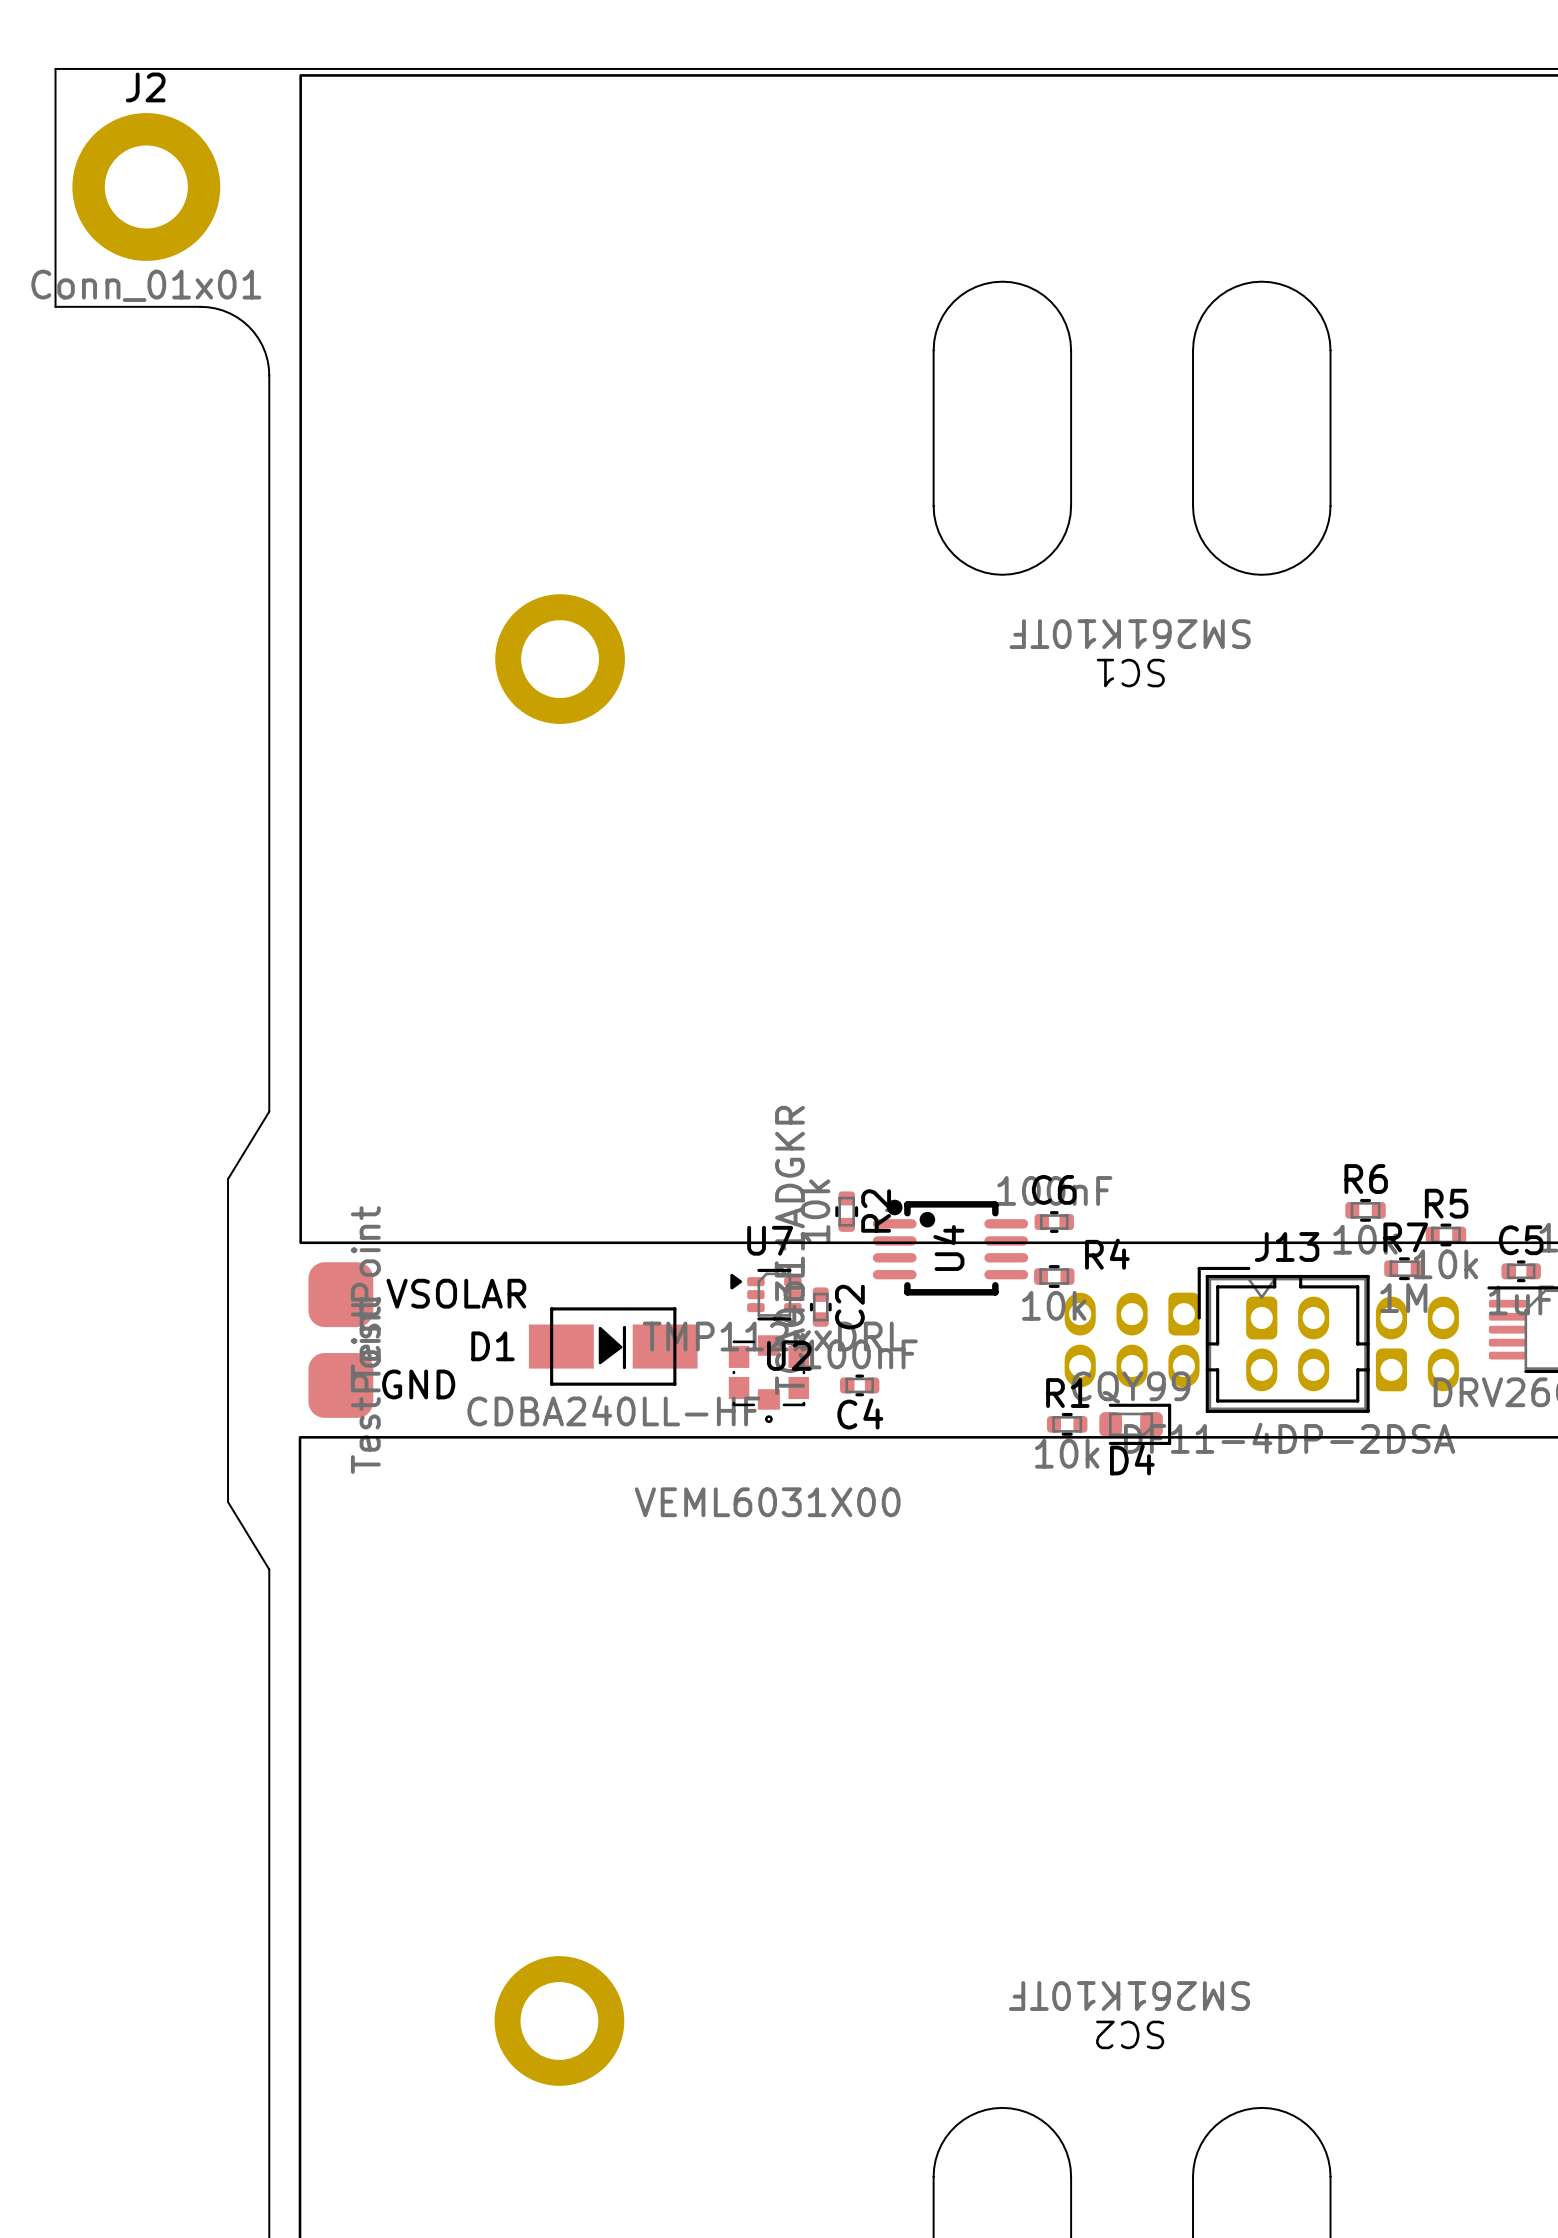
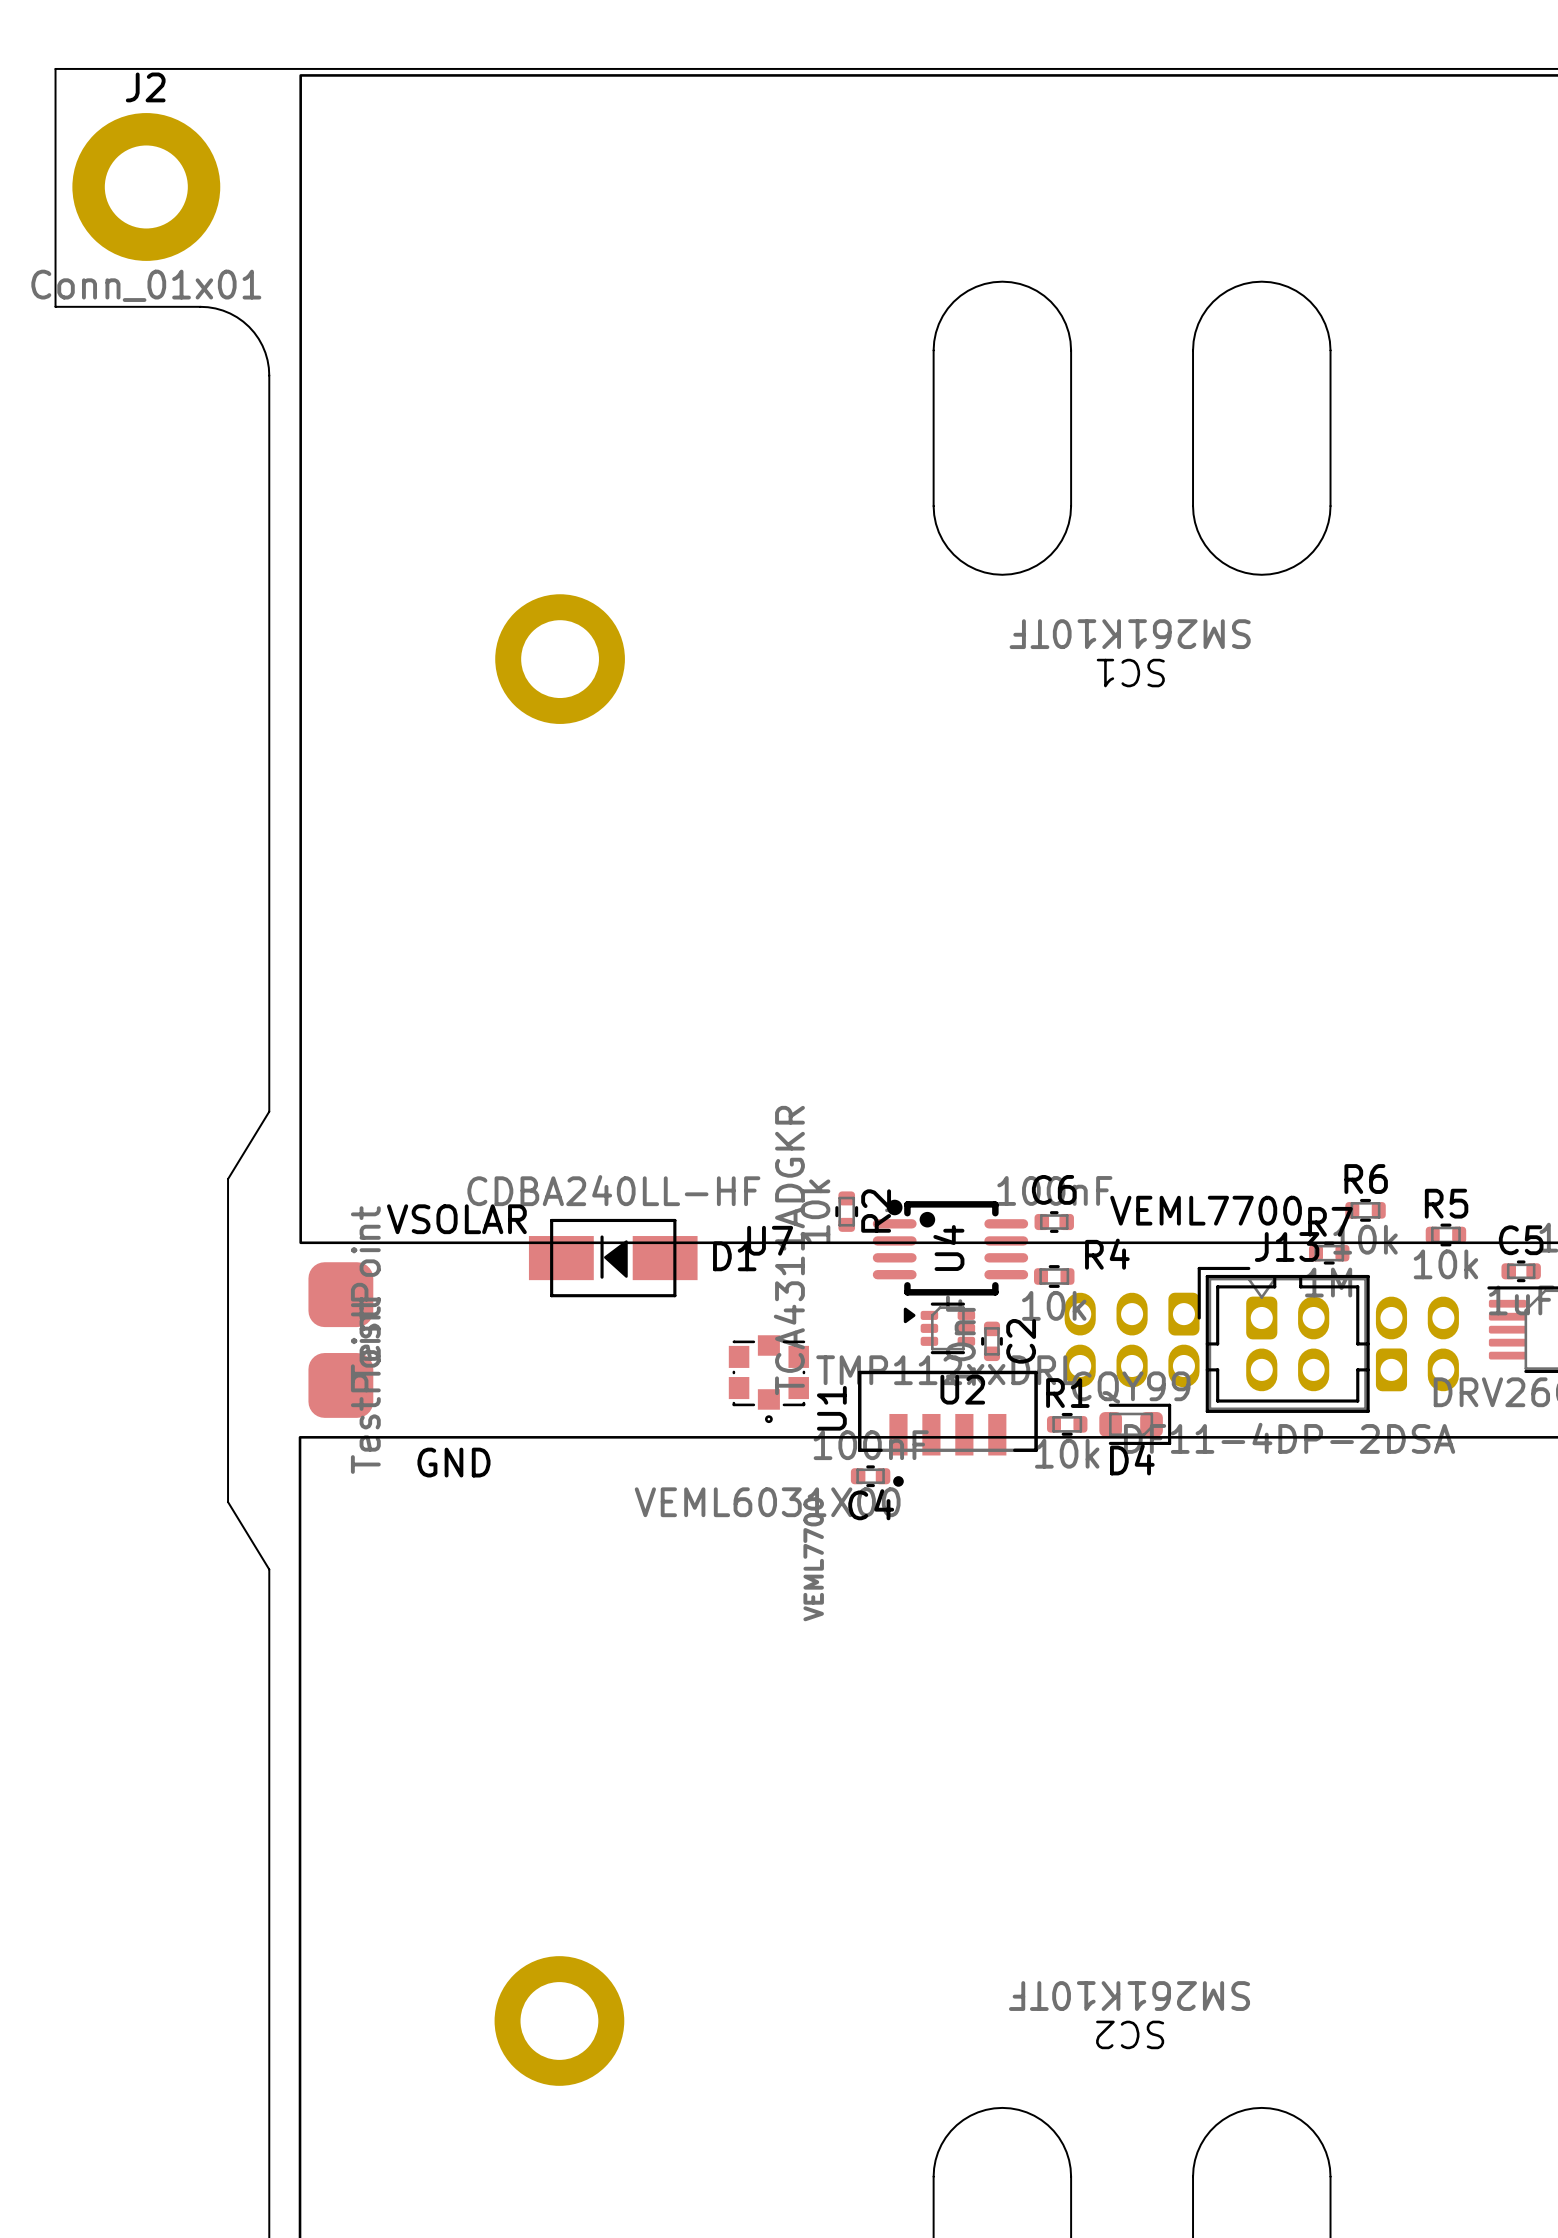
text: none -> VEML7700 (1206, 1210)
R7 position: (1404, 1268) -> (1329, 1253)
text position: VSOLAR (456, 1293) -> VSOLAR (456, 1219)
U2 position: (765, 1294) -> (939, 1328)
C2 position: (820, 1307) -> (991, 1341)
D1 rotation: 0° (613, 1346) -> 180° (613, 1258)
text position: GND (418, 1384) -> GND (453, 1462)
C4 position: (859, 1385) -> (870, 1476)
U1: none -> VEML7700 (947, 1428)

